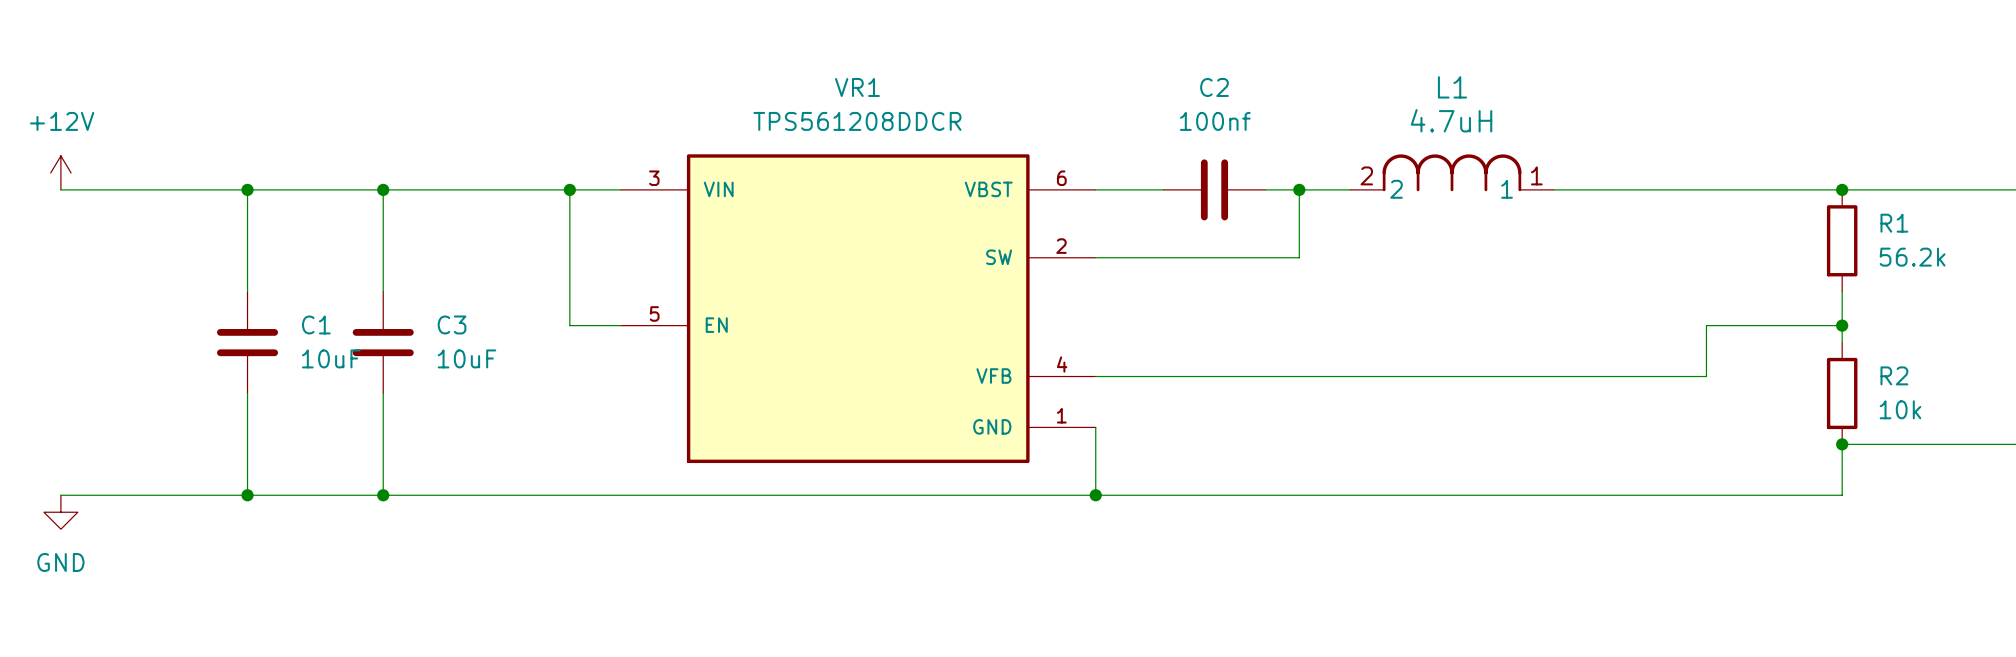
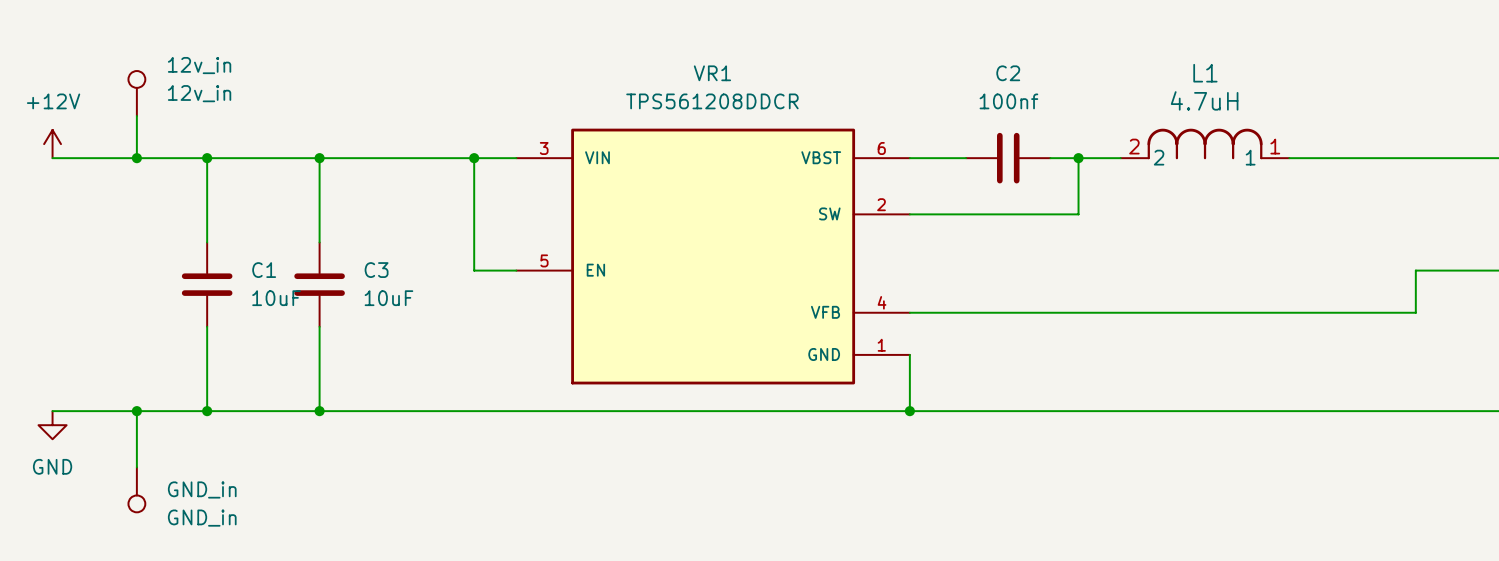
12v_in: none -> 12v_in (136, 93)
wire: none -> (136, 115) (136, 158)
junction: none -> (136, 158)
wire: none -> (136, 411) (136, 467)
junction: none -> (136, 411)
GND_in: none -> GND_in (136, 489)

